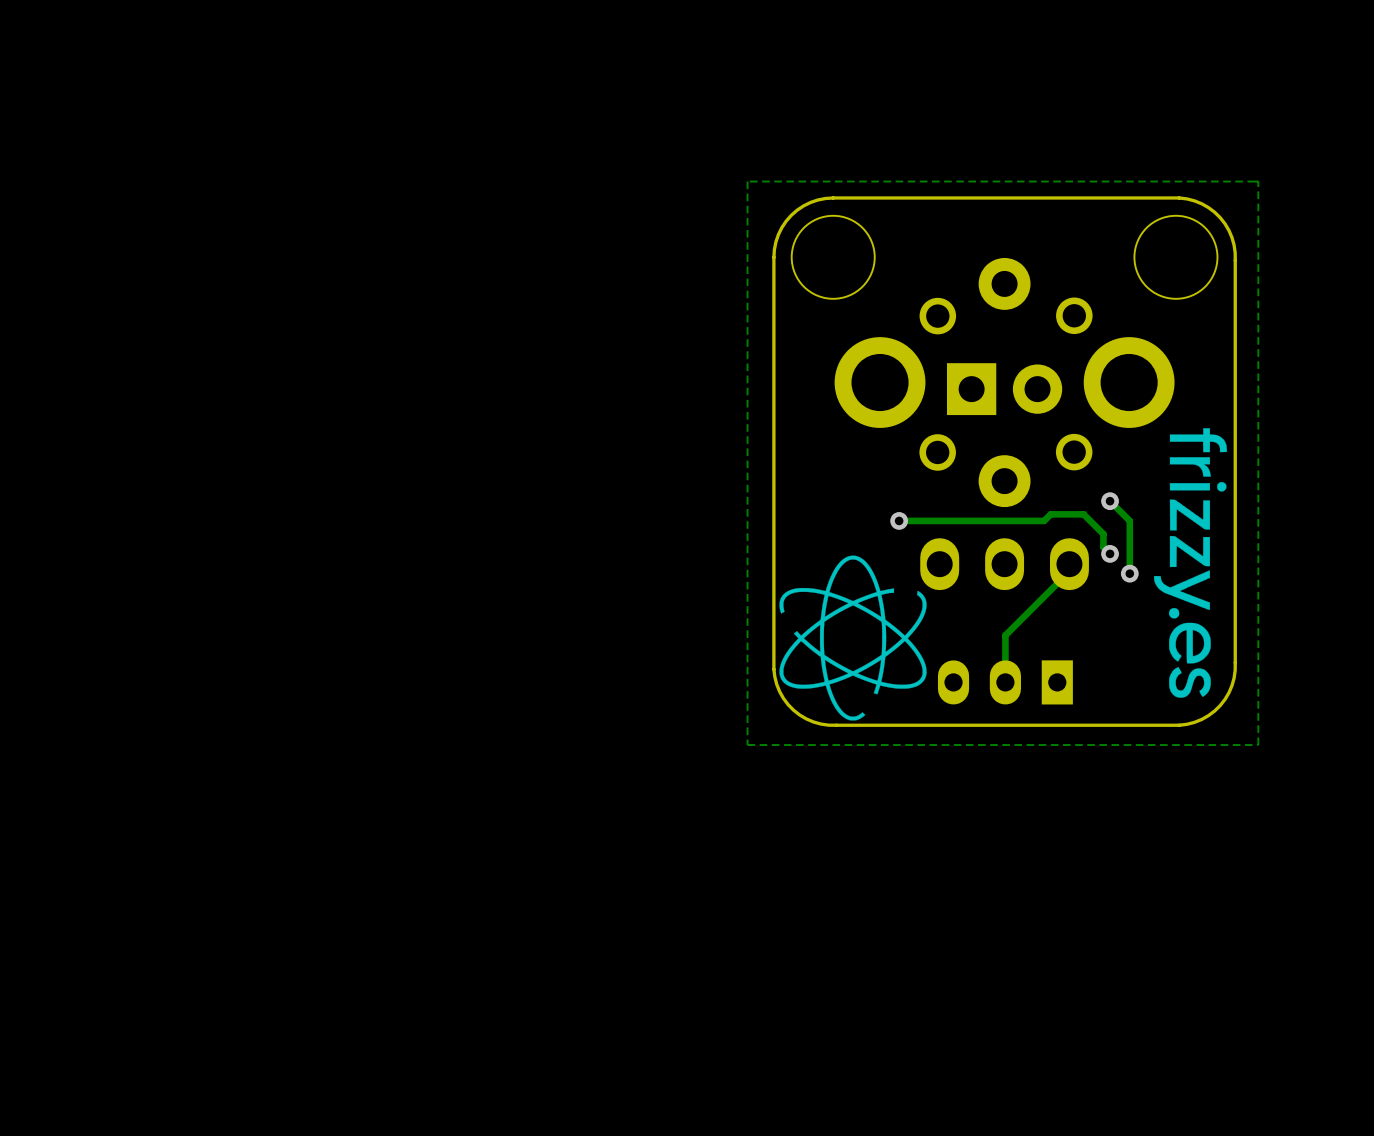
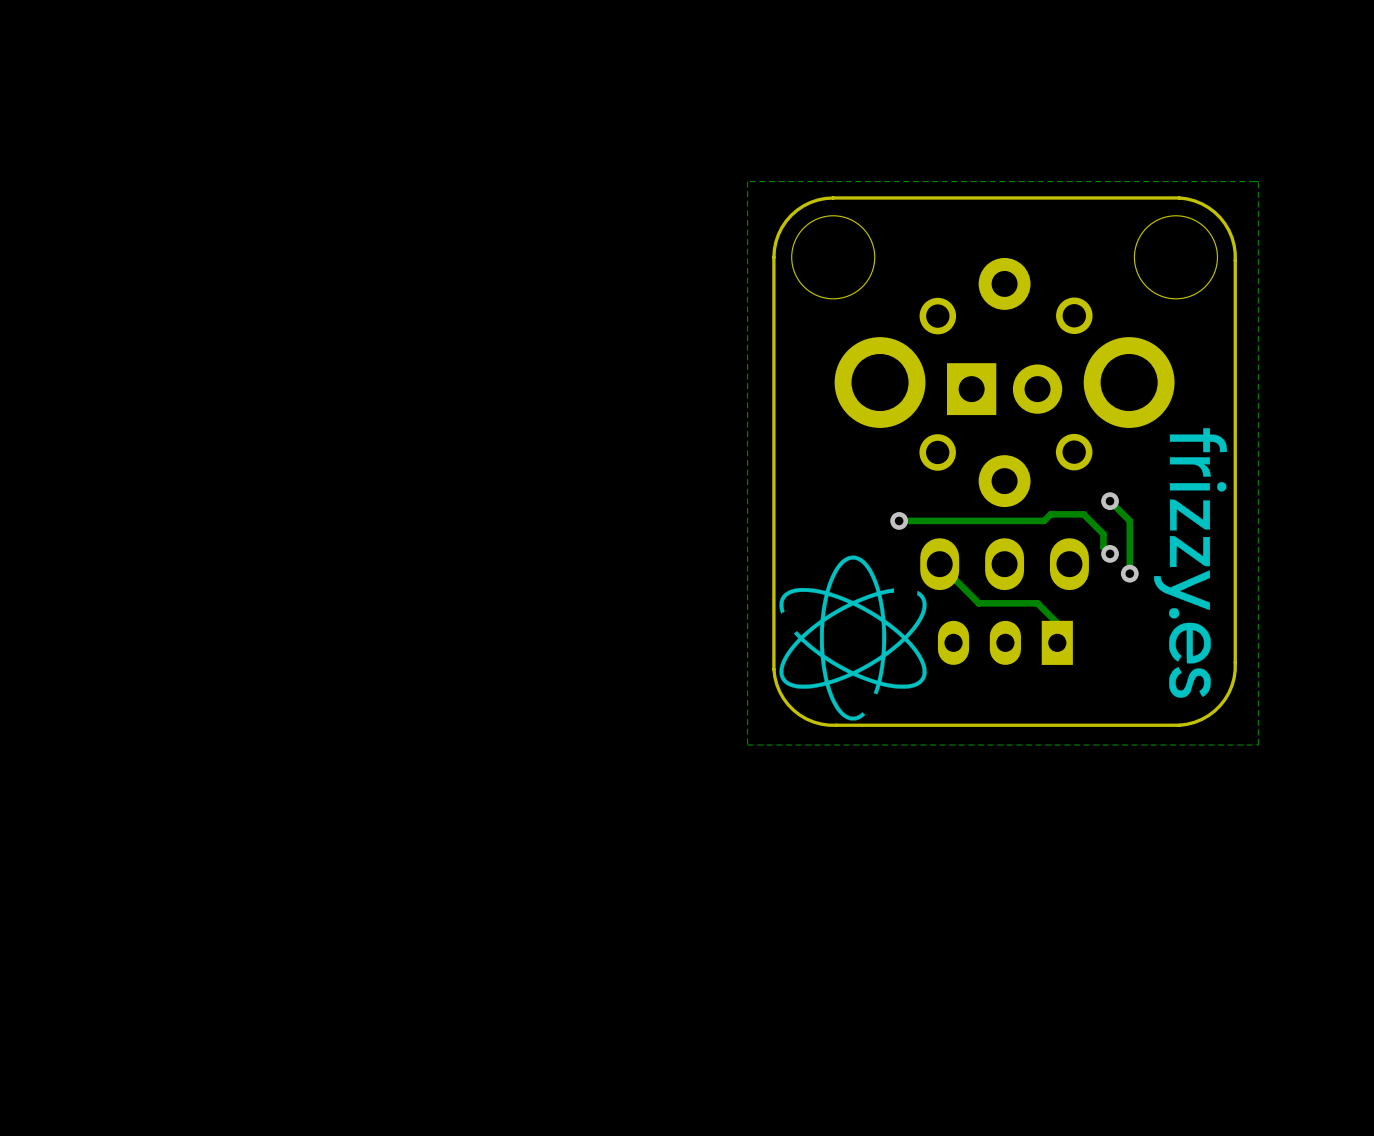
track: none -> (939, 564) (978, 603) (1037, 603) (1057, 623) (1057, 642)
track: (1069, 564) (1069, 571) (1005, 635) (1005, 682) -> none
part position: (1005, 682) -> (1005, 642)

